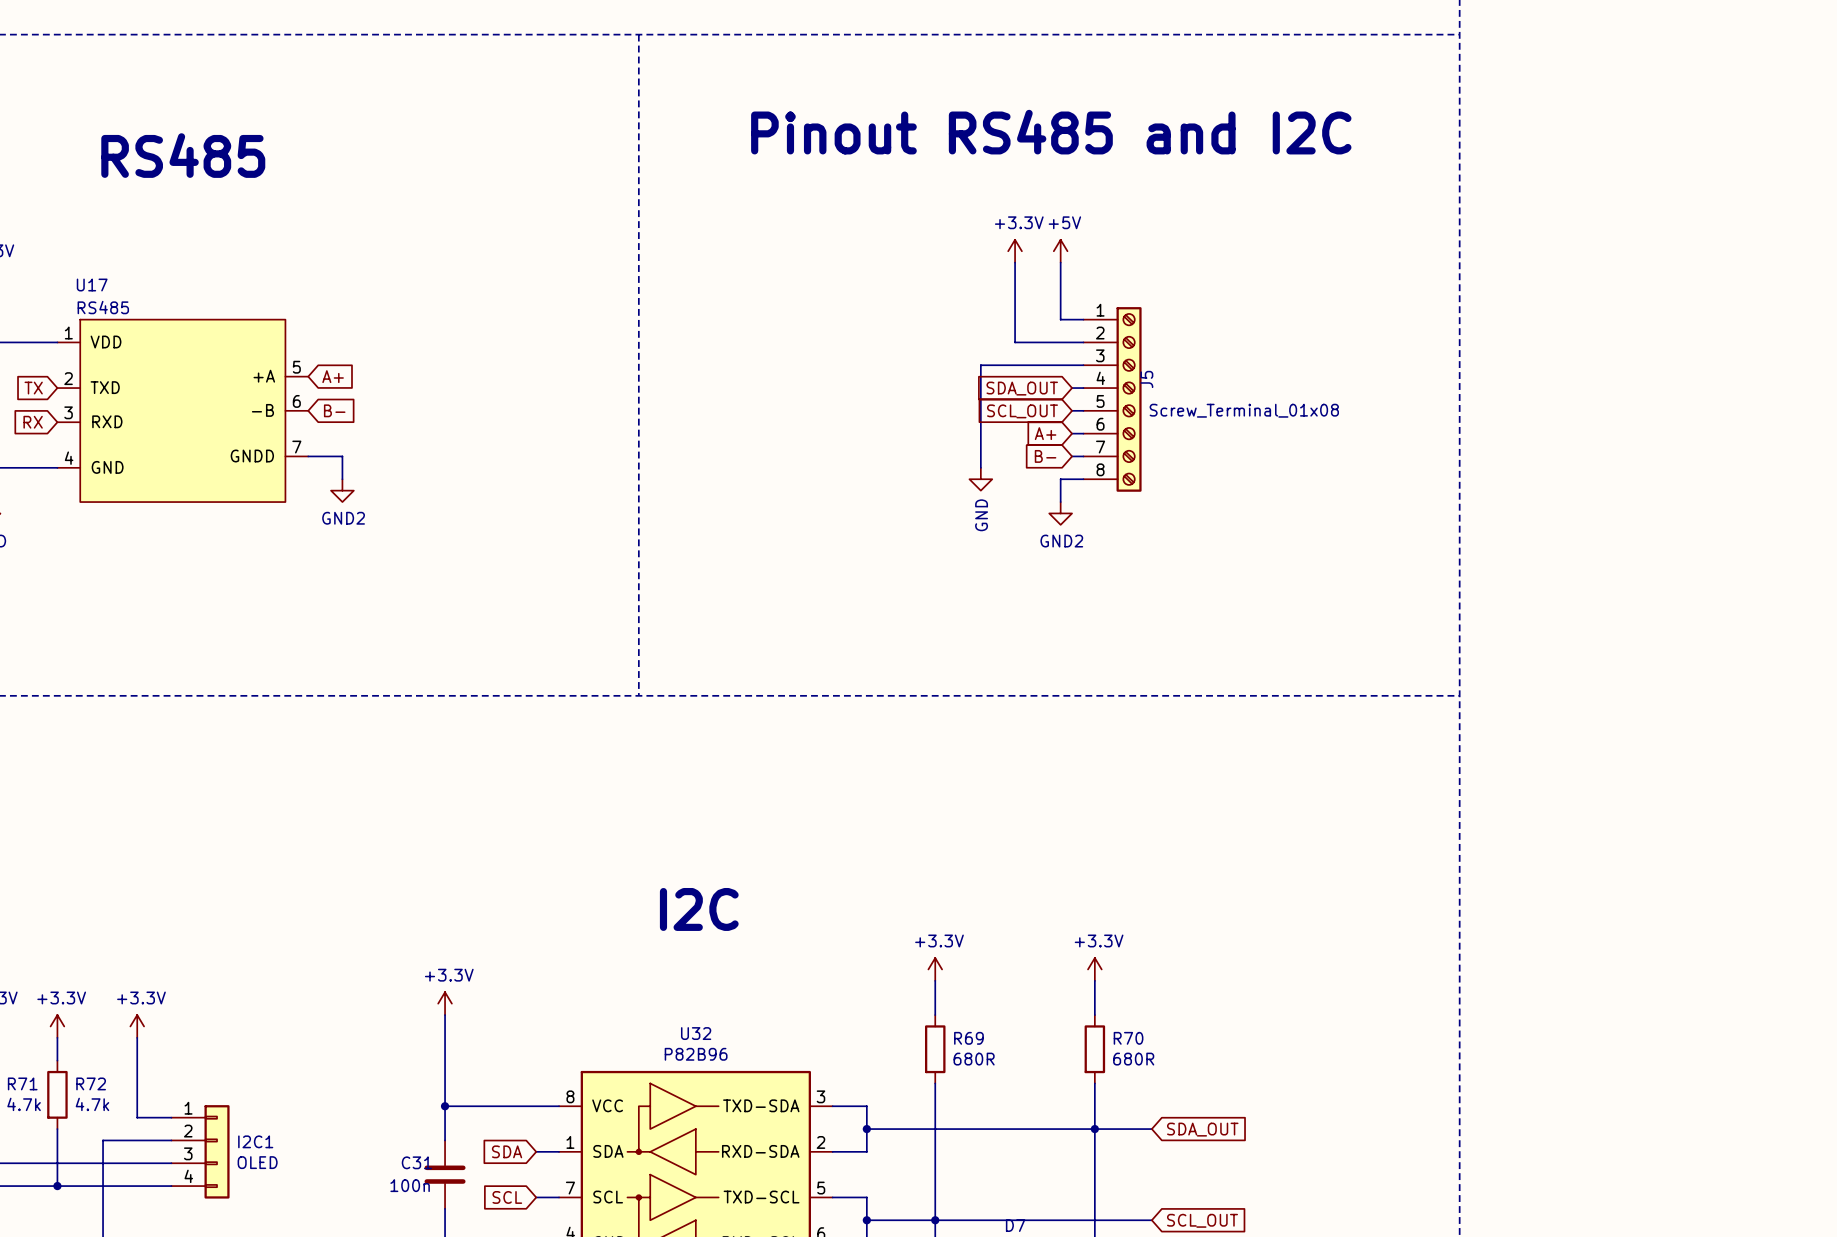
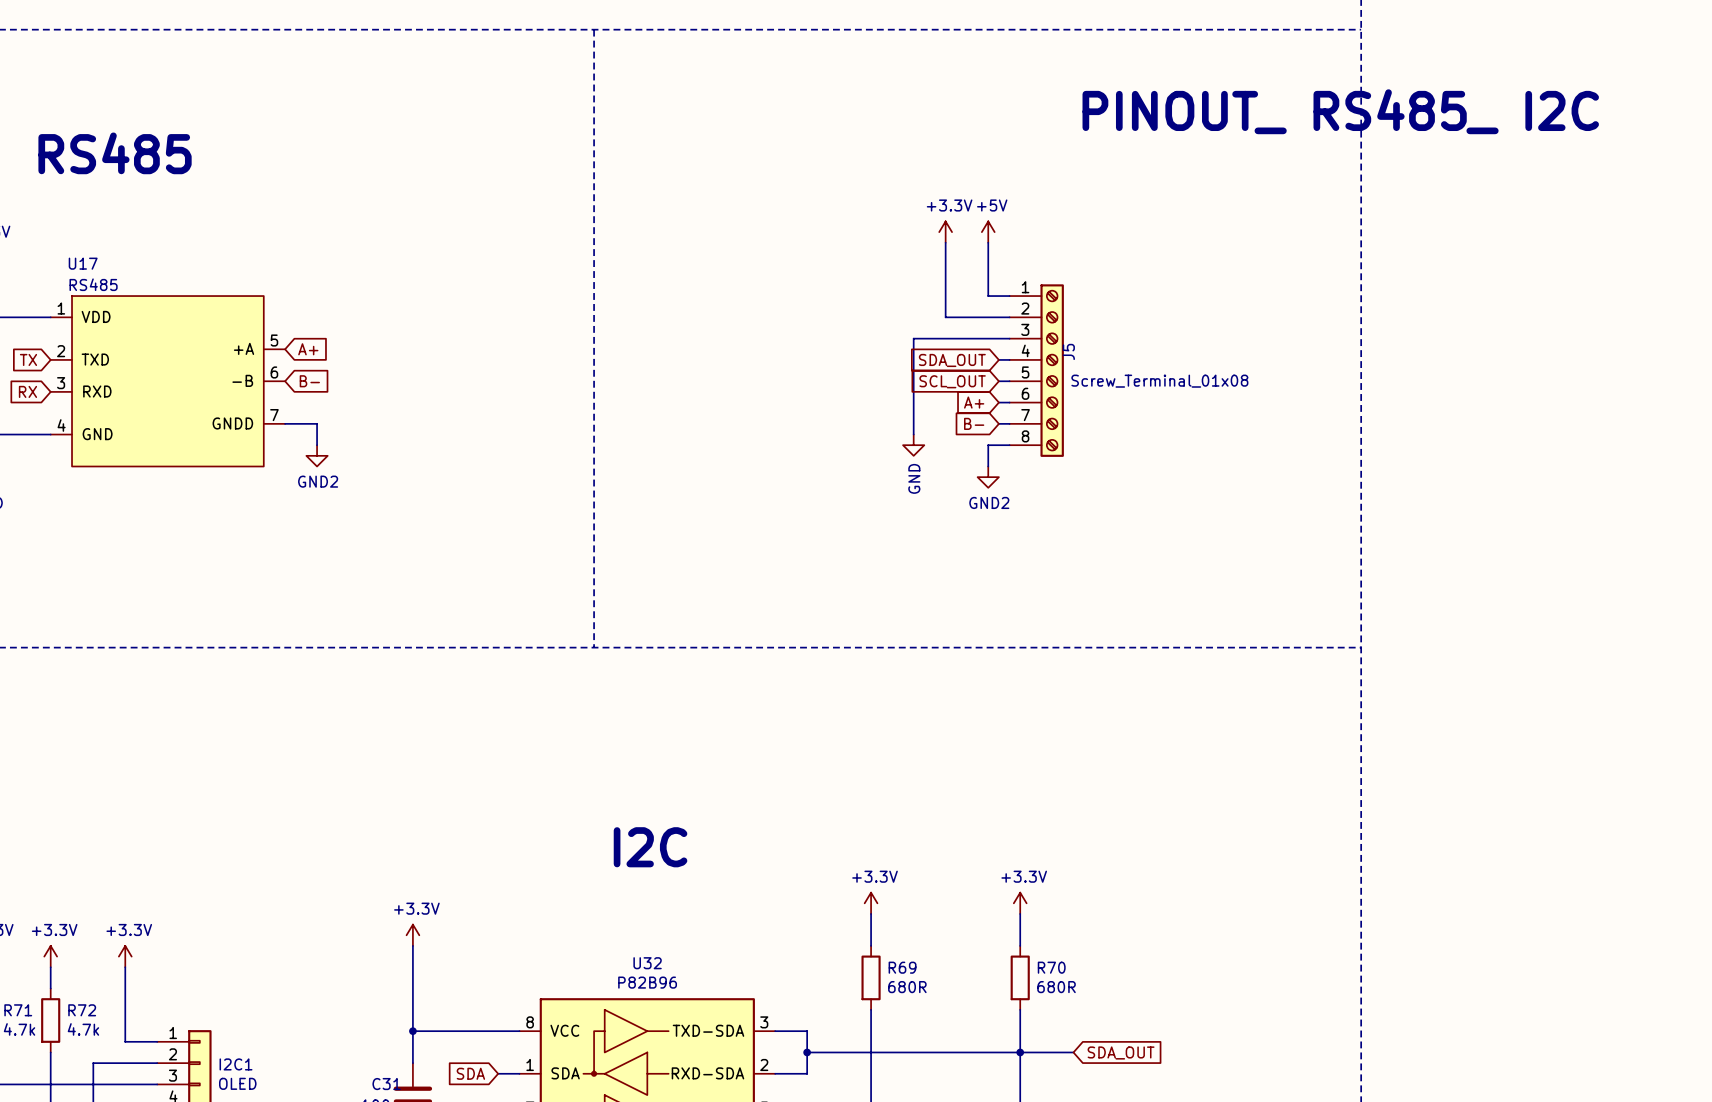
text: none -> PINOUT_ RS485_ I2C (1340, 111)
text: Pinout RS485 and I2C (1051, 132) -> none
text position: RS485 (183, 155) -> RS485 (115, 153)

